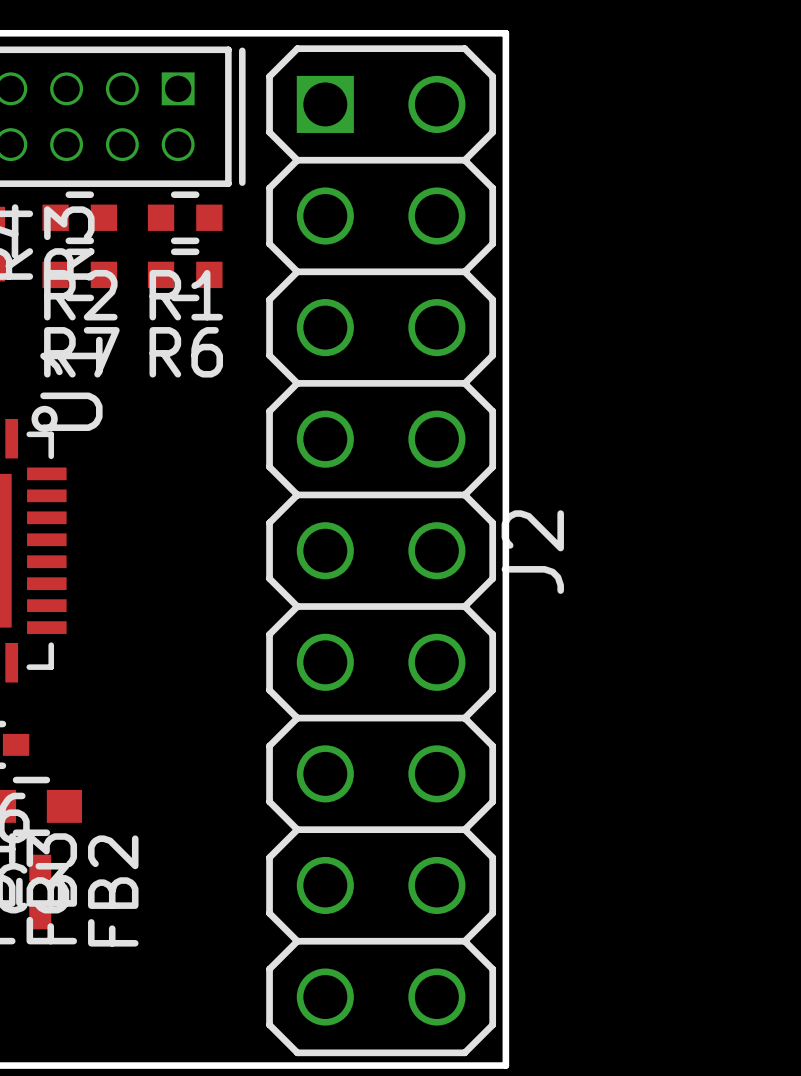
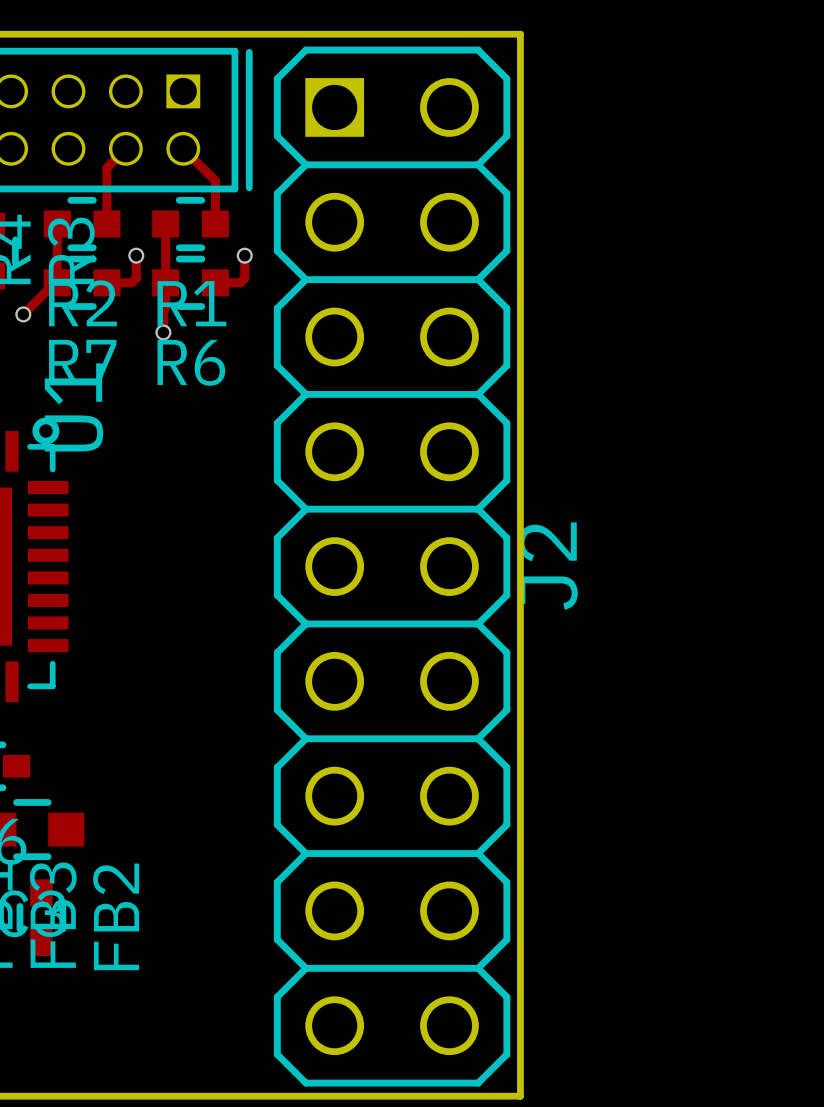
track: none -> (125, 148) (106, 167) (106, 224)
track: none -> (183, 148) (215, 180) (215, 224)
track: none -> (57, 224) (57, 282) (54, 282) (23, 314)
track: none -> (165, 224) (165, 307) (163, 309) (163, 332)
track: none -> (136, 255) (136, 278) (131, 282) (106, 282)
via: none -> (136, 255)
track: none -> (244, 255) (244, 278) (240, 282) (215, 282)
via: none -> (244, 255)
via: none -> (23, 314)
via: none -> (163, 332)

